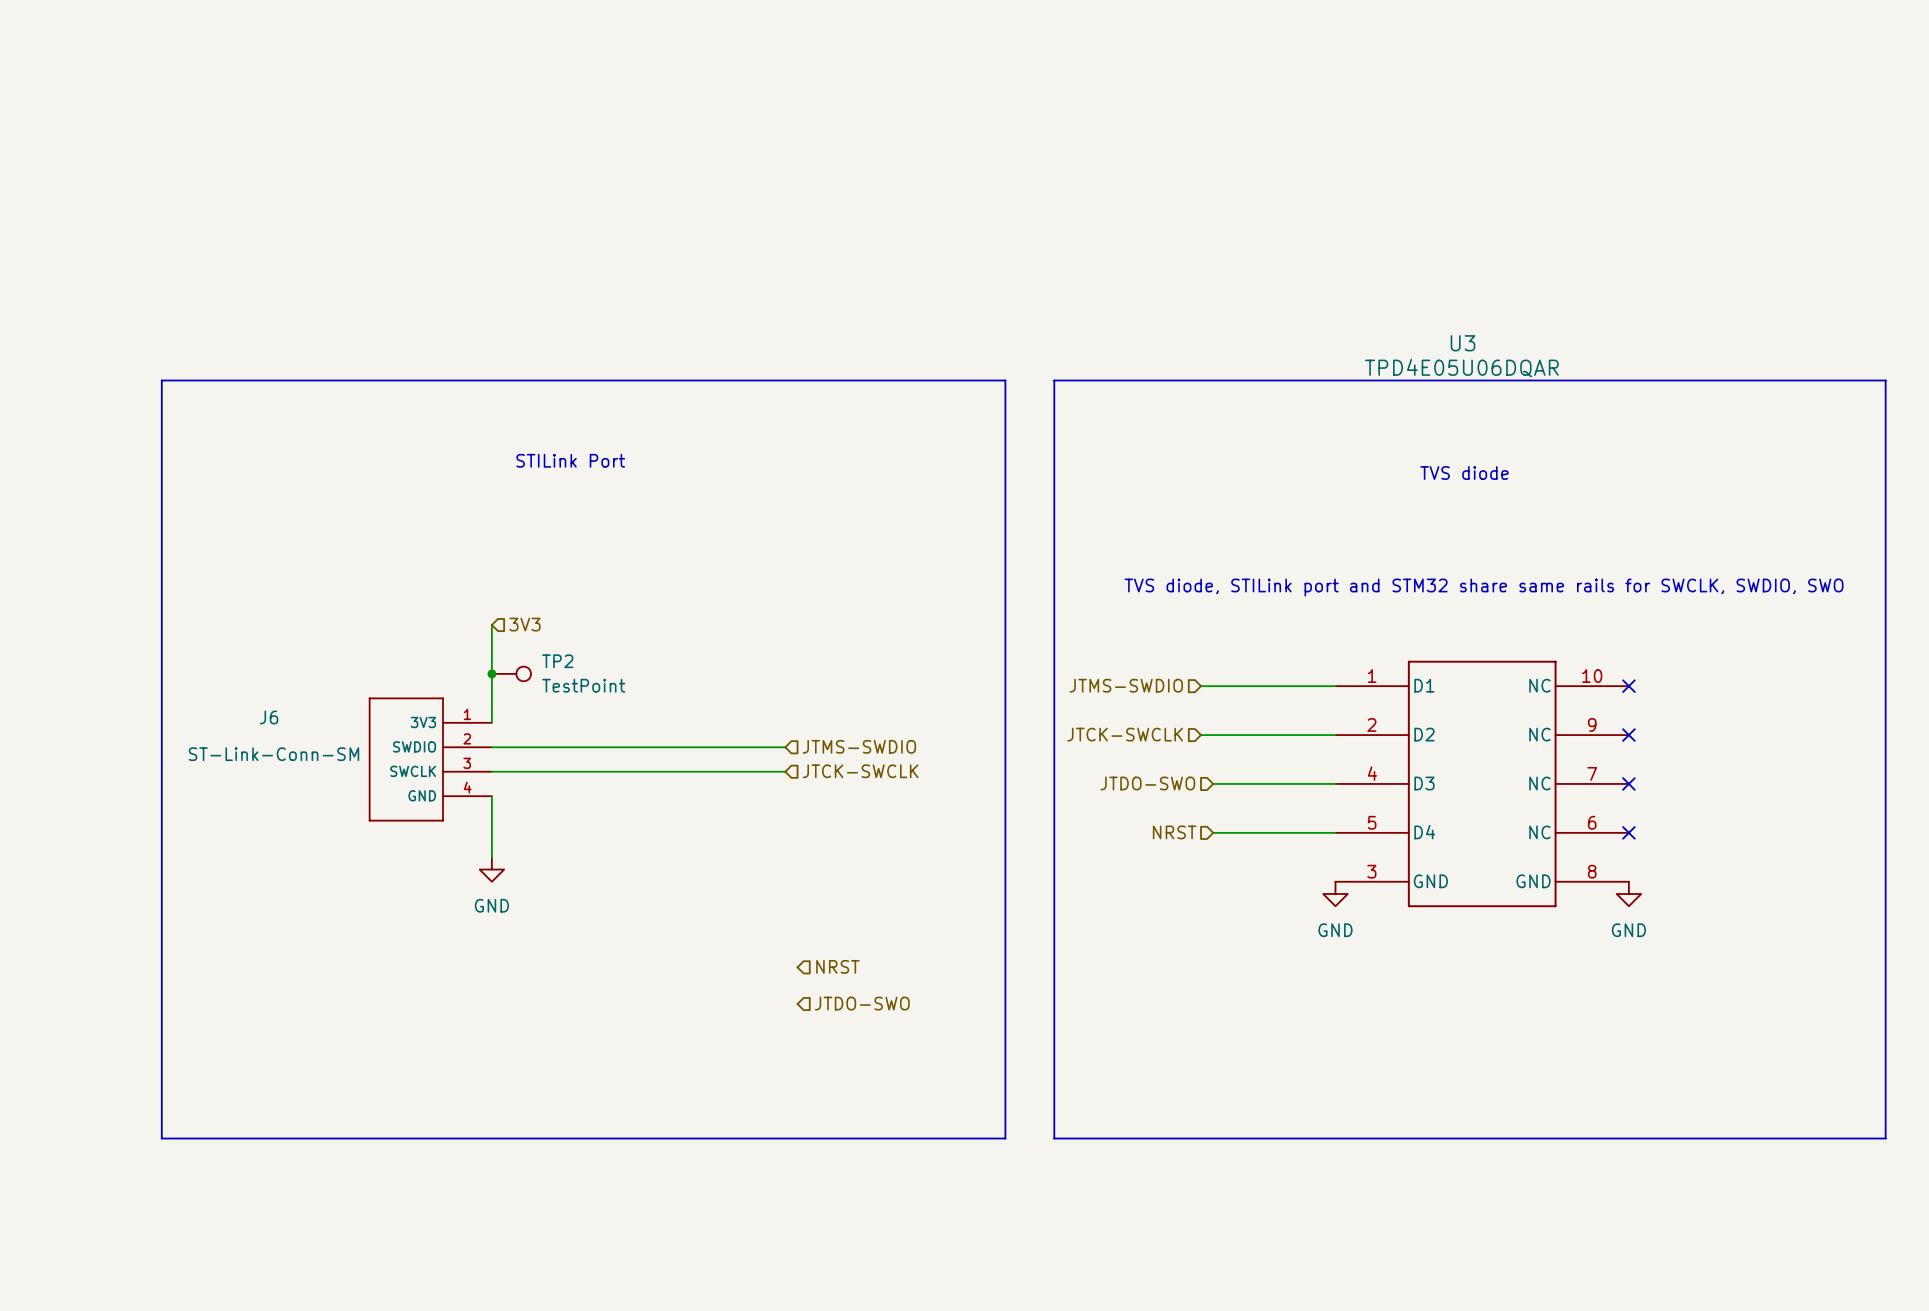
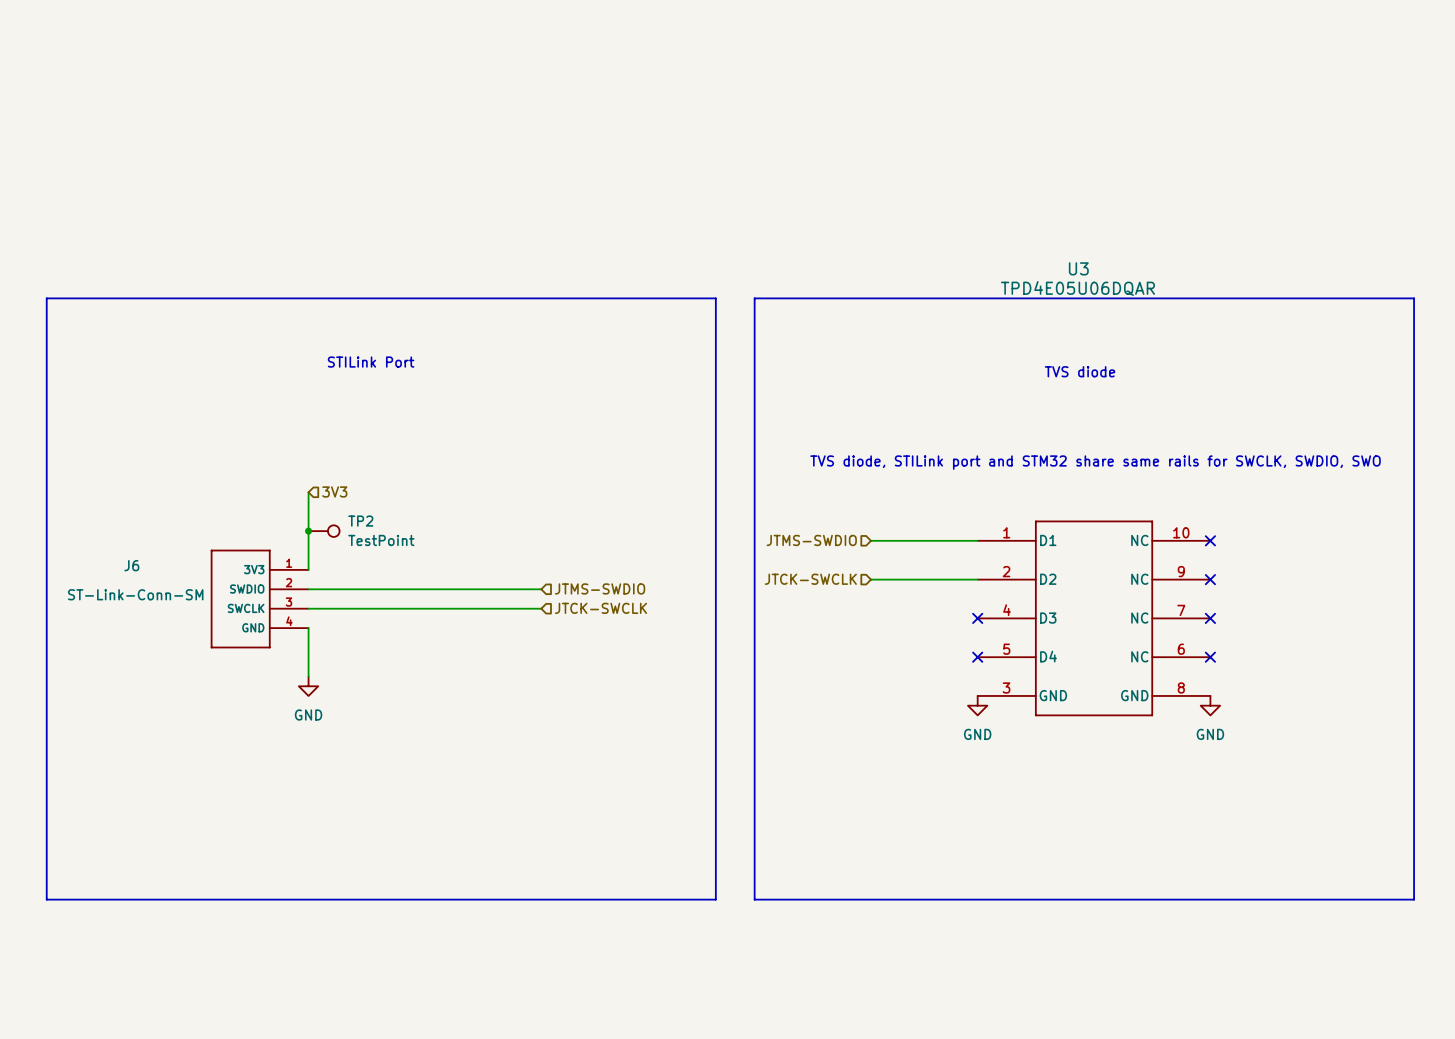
hierarchical label: JTDO-SWO (1147, 783) -> none
wire: (1213, 783) (1335, 783) -> none
no-connect mark: none -> (977, 618)
hierarchical label: NRST (1174, 832) -> none
wire: (1213, 832) (1335, 832) -> none
no-connect mark: none -> (977, 657)
hierarchical label: NRST (837, 966) -> none
hierarchical label: JTDO-SWO (862, 1003) -> none

